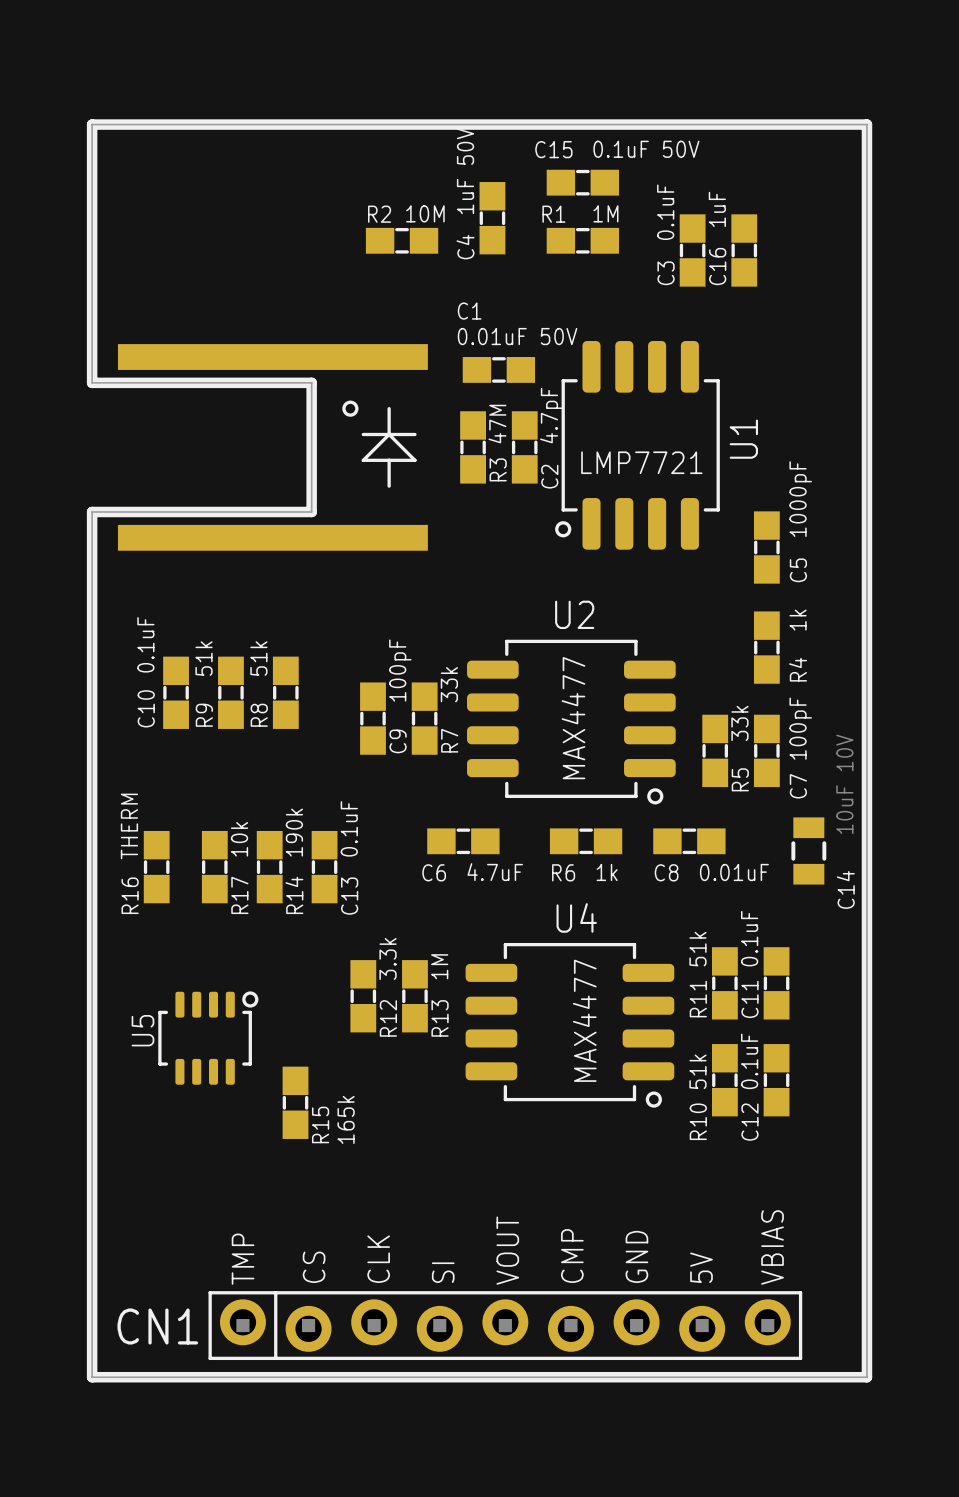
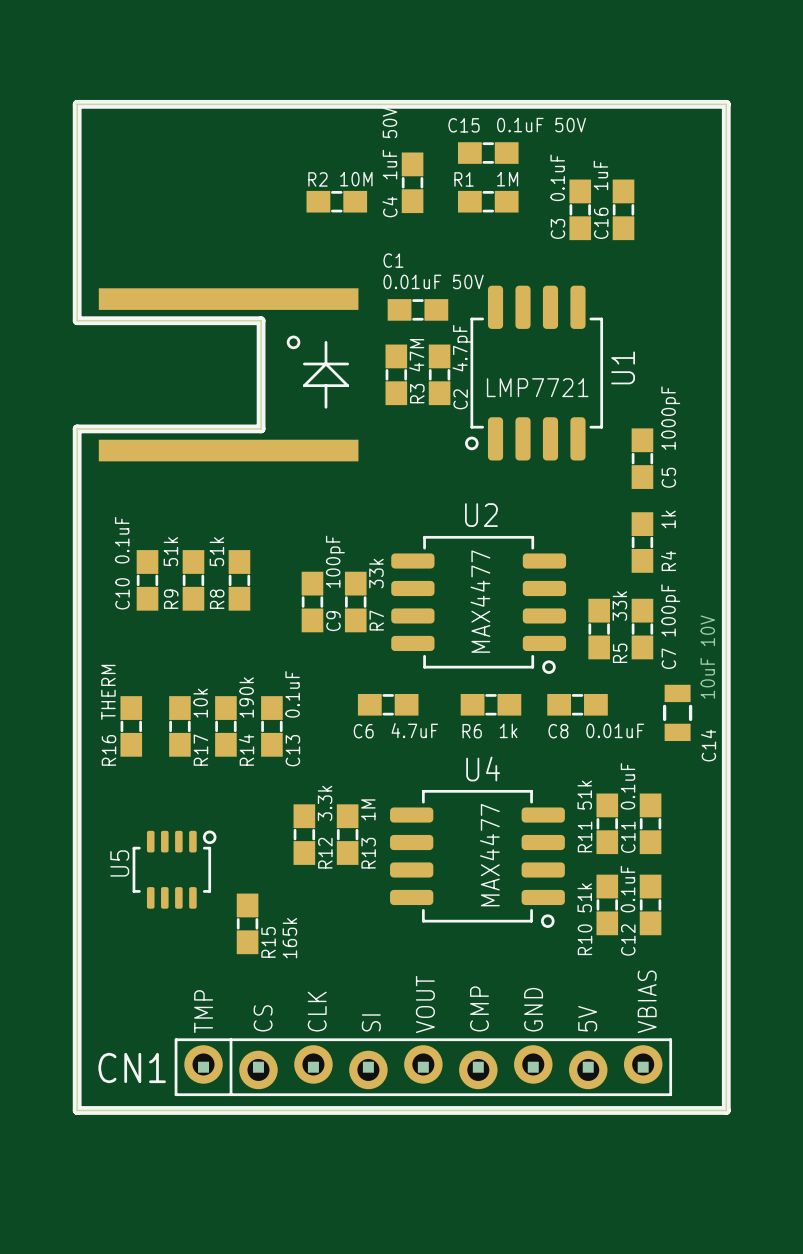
text position: VBIAS (772, 1247) -> VBIAS (647, 1001)
text position: VOUT (507, 1250) -> VOUT (425, 1004)
text position: CMP (572, 1256) -> CMP (479, 1008)
text position: GND (636, 1256) -> GND (533, 1009)
text position: TMP (243, 1259) -> TMP (203, 1011)
text position: CLK (378, 1259) -> CLK (317, 1011)
text position: CS (314, 1267) -> CS (263, 1018)
text position: 5V (701, 1267) -> 5V (587, 1018)
text position: SI (443, 1272) -> SI (371, 1022)
board edge: (92, 1325) (92, 1377) (866, 1377) (866, 1325) -> (77, 1110) (726, 1110)
line: (92, 1325) (92, 1377) (866, 1377) (866, 1325) -> (77, 1110) (726, 1110)
CN1 position: (505, 1325) -> (423, 1067)

